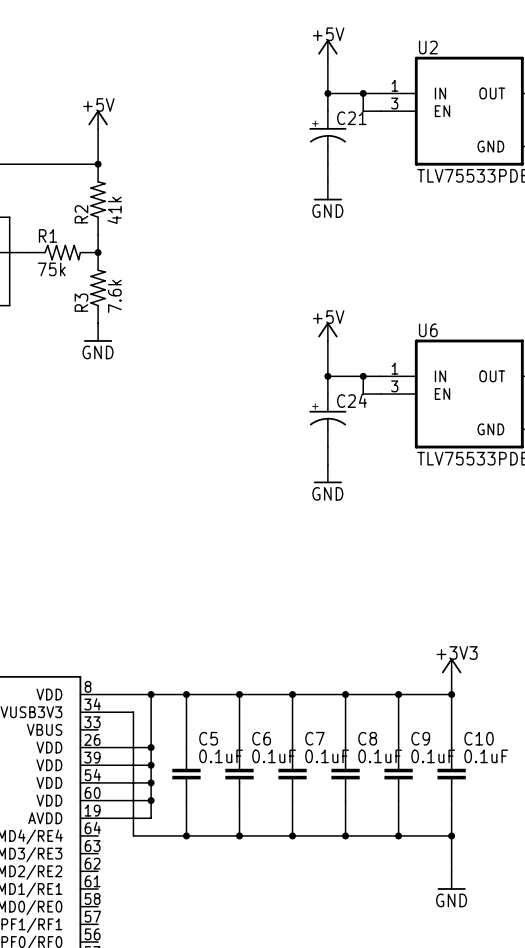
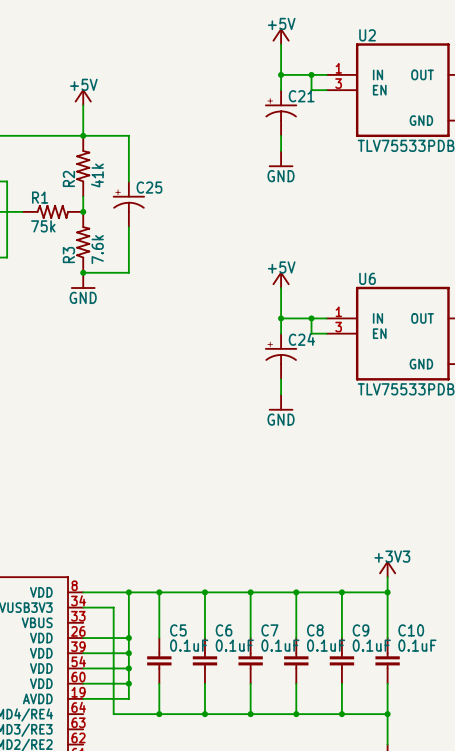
wire: none -> (83, 135) (128, 135) (128, 181)
C25: none -> (128, 204)
wire: none -> (128, 227) (128, 272) (83, 272)
junction: none -> (83, 272)

